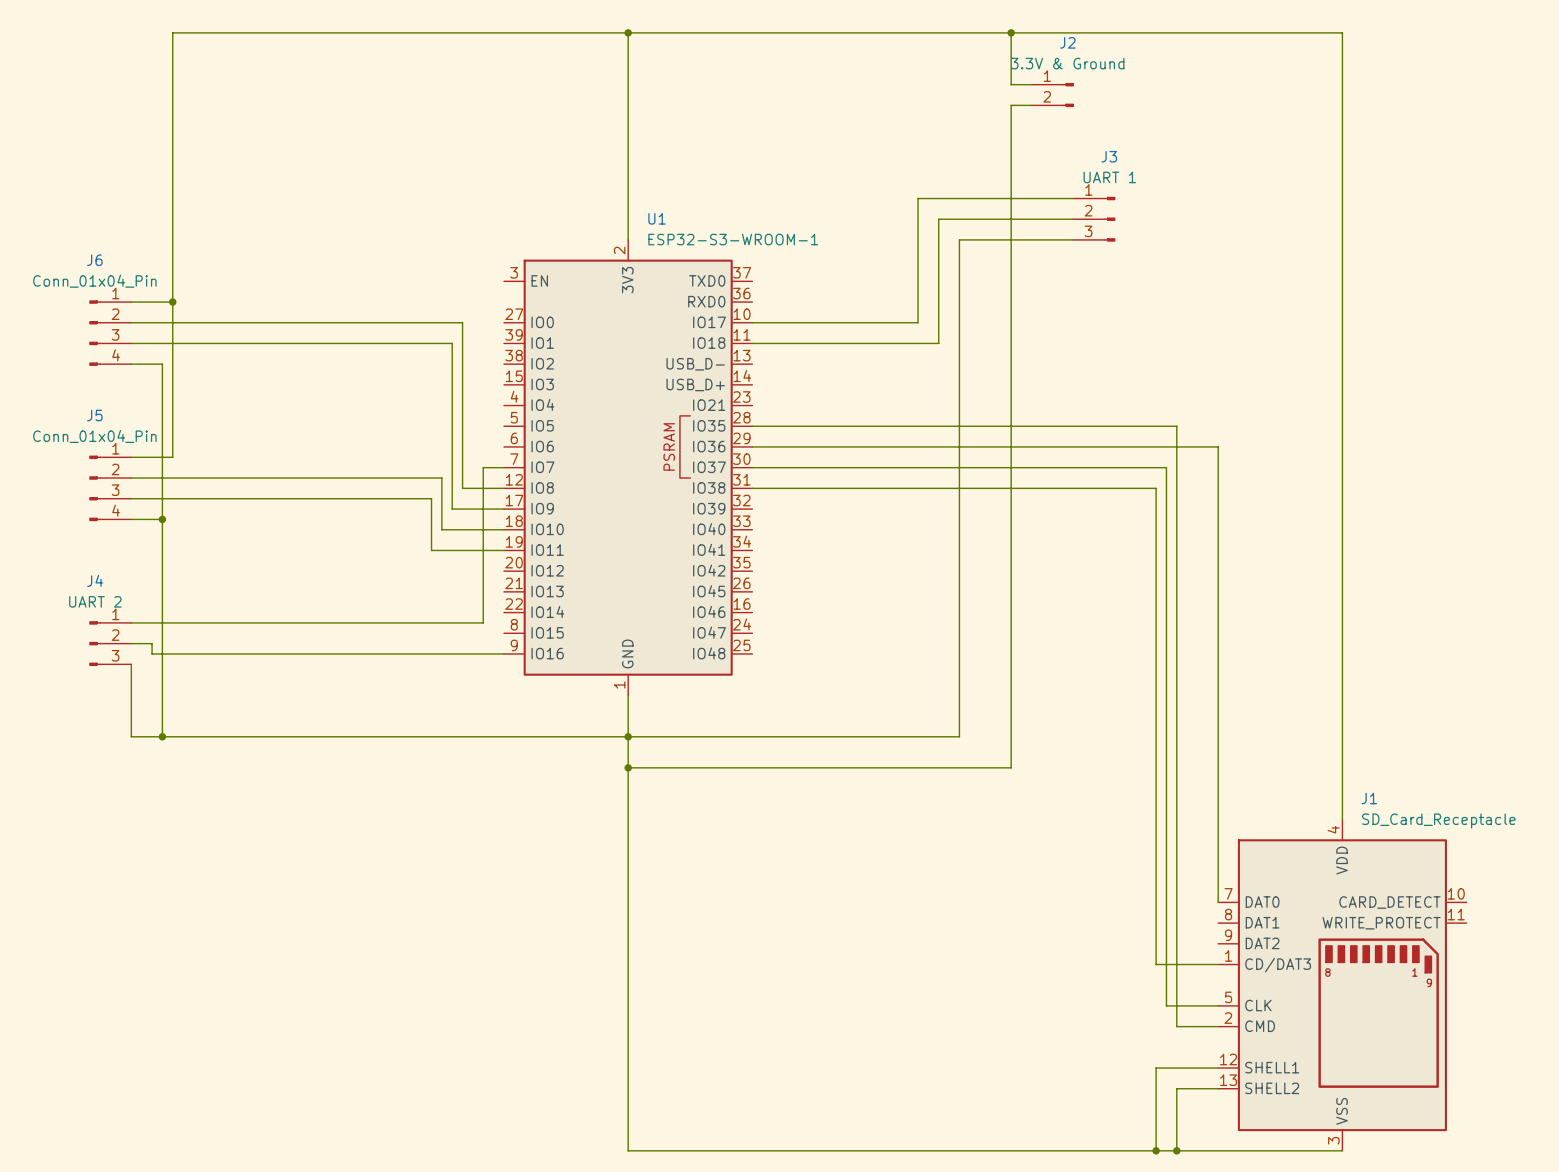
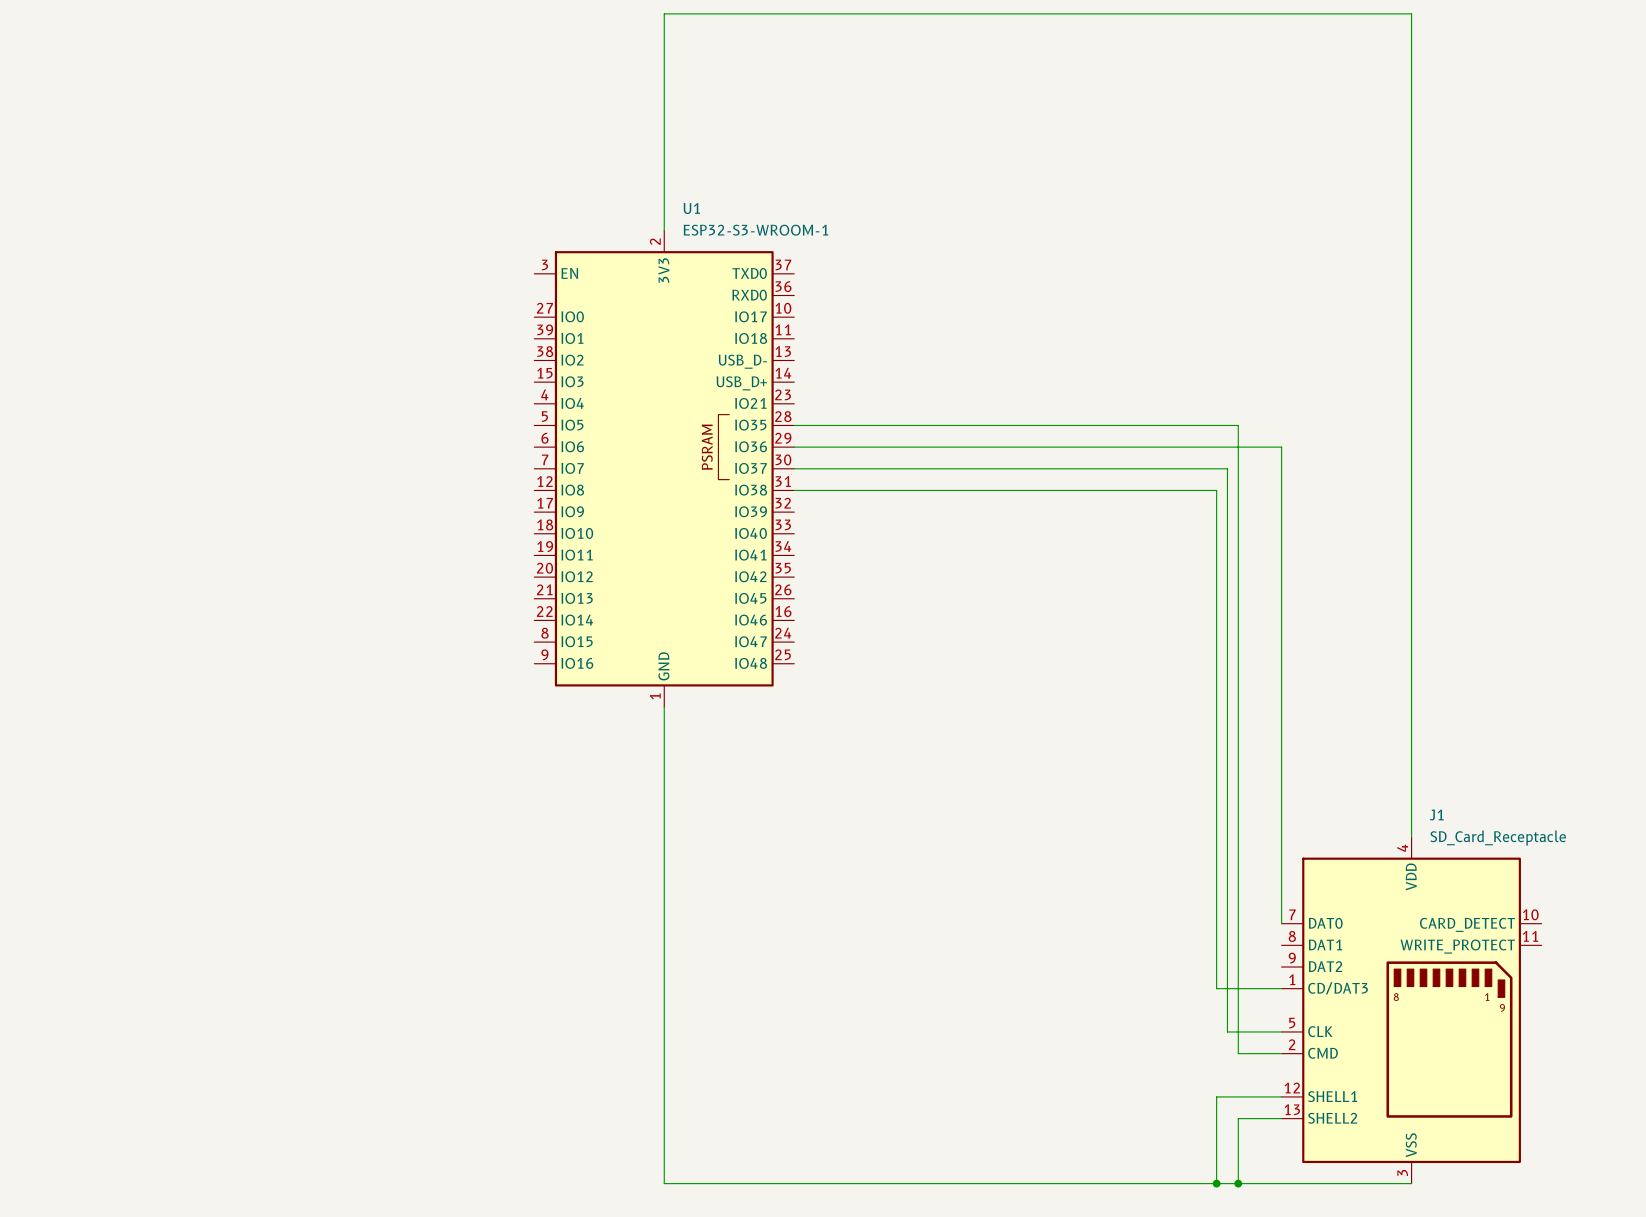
wire: (628, 32) (172, 32) (172, 457) (131, 457) -> none
junction: (628, 32) -> none
wire: (1011, 32) (1011, 84) (1031, 84) -> none
junction: (1011, 32) -> none
J2: 3.3V & Ground (1052, 95) -> none
wire: (1031, 105) (1011, 105) (1011, 767) (628, 767) -> none
wire: (1073, 198) (918, 198) (918, 322) (752, 322) -> none
wire: (1073, 219) (938, 219) (938, 343) (752, 343) -> none
J3: UART 1 (1094, 219) -> none
wire: (1073, 239) (959, 239) (959, 736) (131, 736) (131, 664) -> none
wire: (131, 302) (172, 302) -> none
junction: (172, 302) -> none
wire: (131, 322) (462, 322) (462, 488) (503, 488) -> none
J6: Conn_01x04_Pin (110, 333) -> none
wire: (131, 343) (452, 343) (452, 509) (503, 509) -> none
wire: (131, 364) (162, 364) (162, 736) -> none
wire: (503, 467) (483, 467) (483, 622) (131, 622) -> none
wire: (131, 478) (441, 478) (441, 529) (503, 529) -> none
J5: Conn_01x04_Pin (110, 488) -> none
wire: (131, 498) (431, 498) (431, 550) (503, 550) -> none
wire: (131, 519) (162, 519) -> none
junction: (162, 519) -> none
J4: UART 2 (110, 643) -> none
wire: (131, 643) (152, 643) (152, 653) (503, 653) -> none
junction: (162, 736) -> none
junction: (628, 736) -> none
junction: (628, 767) -> none

